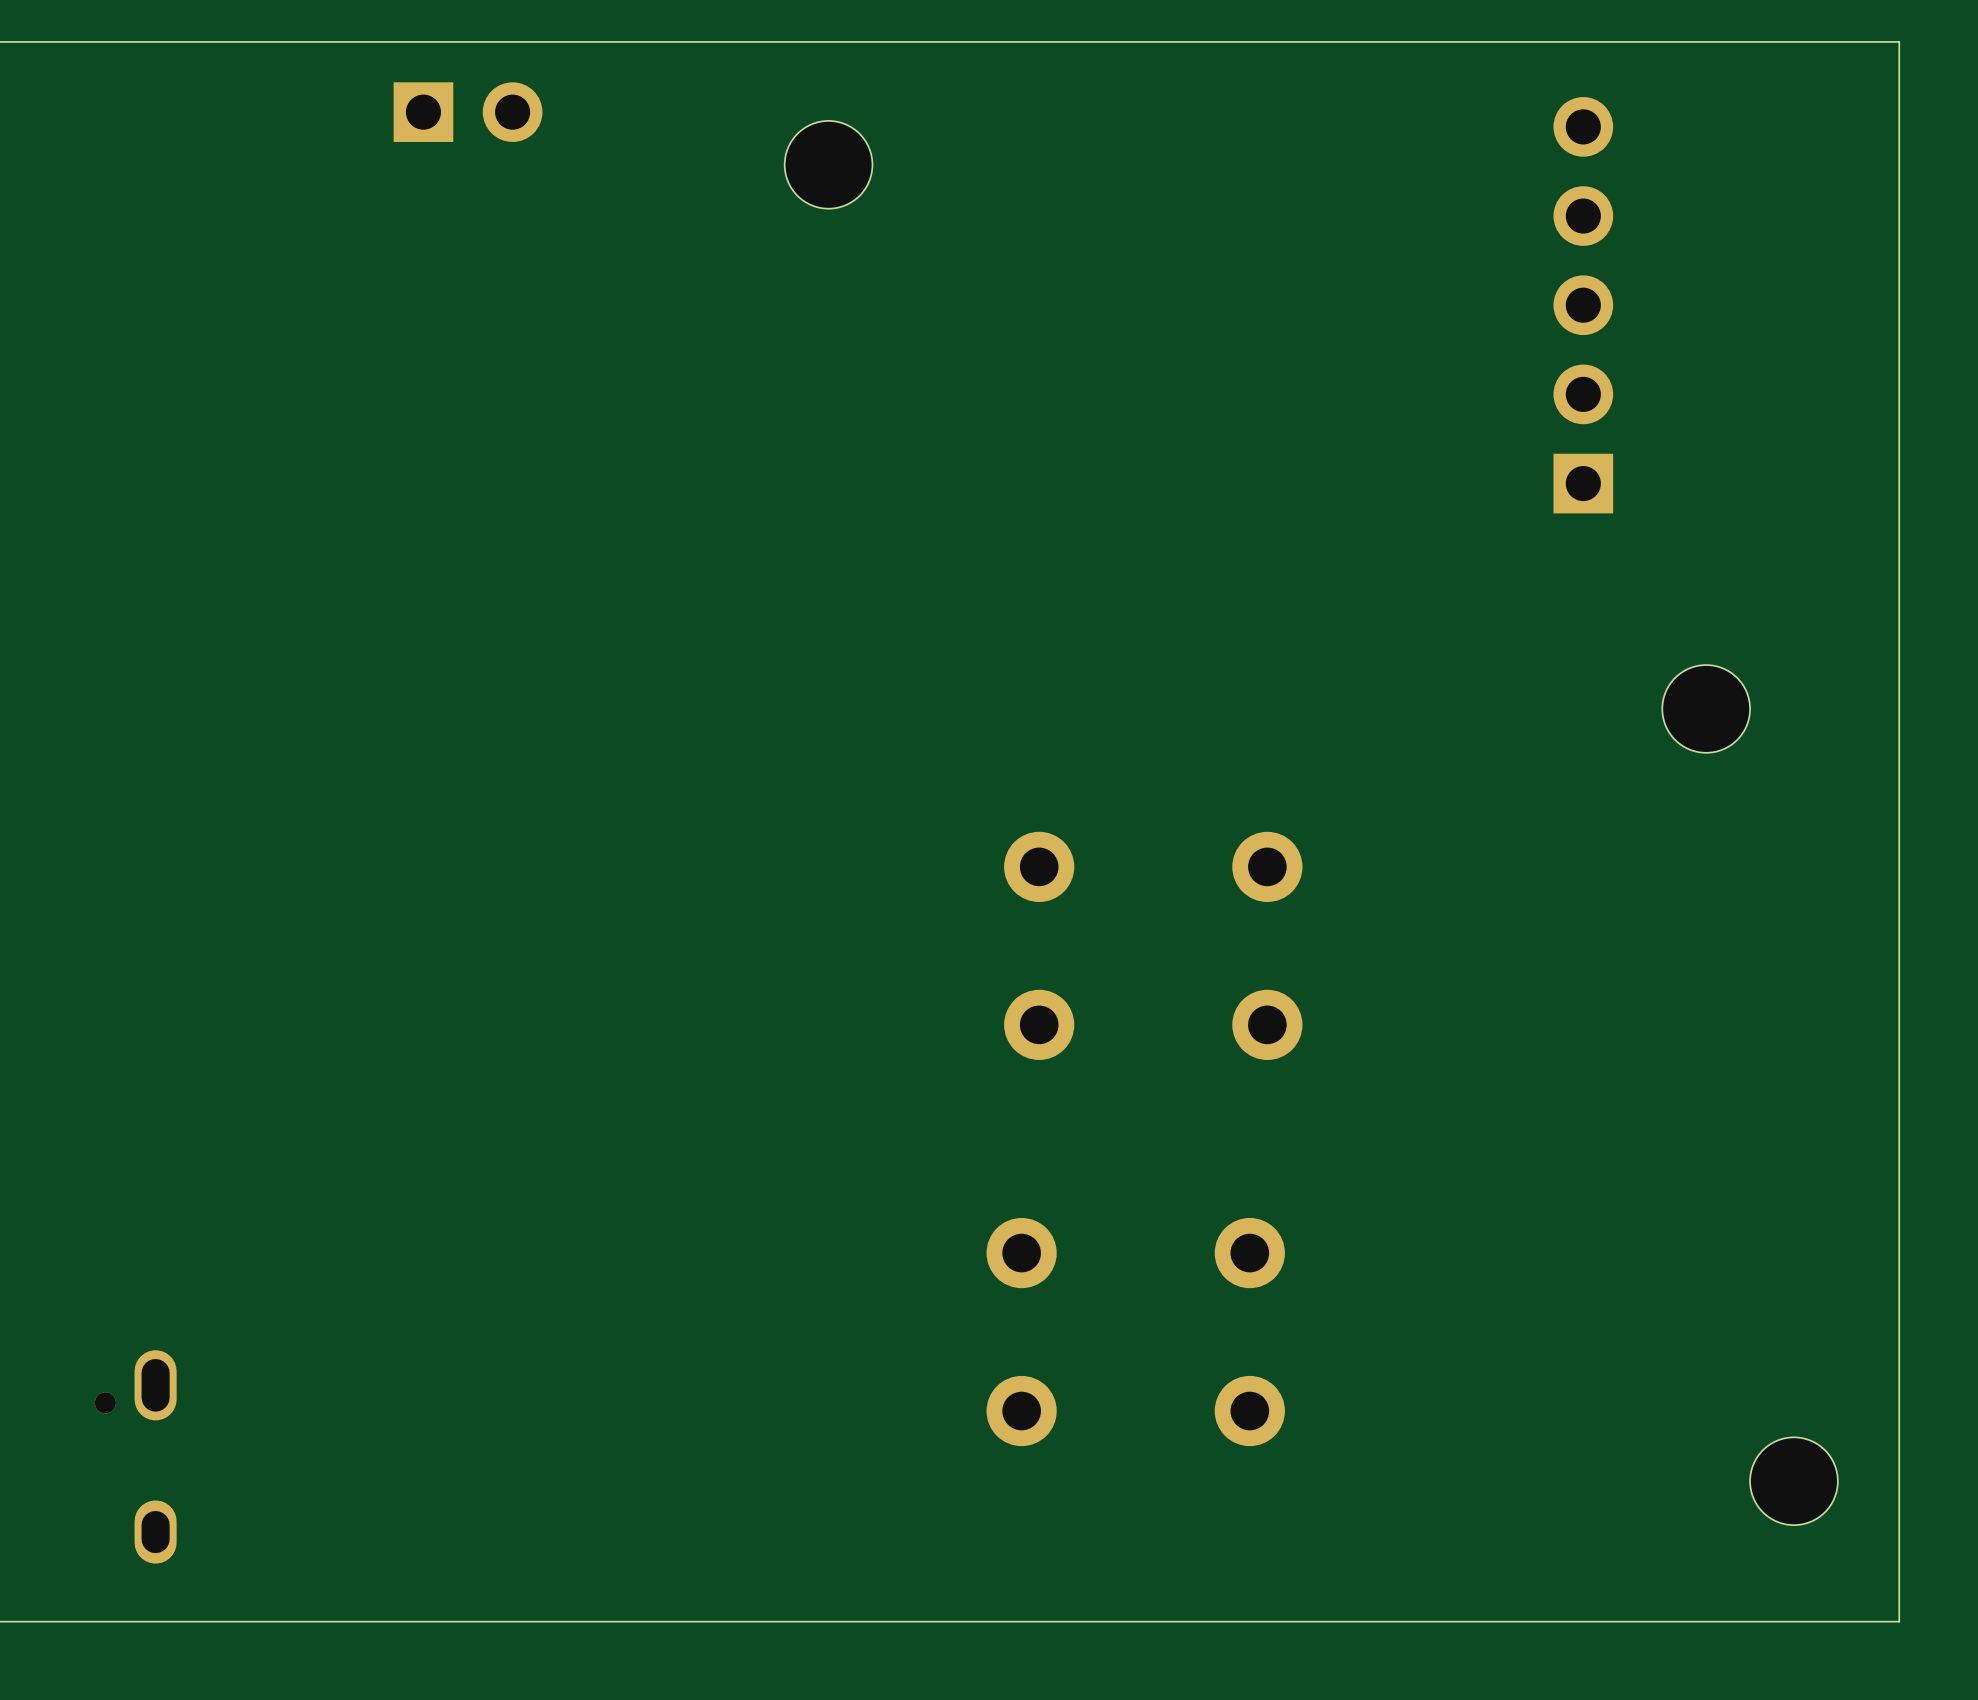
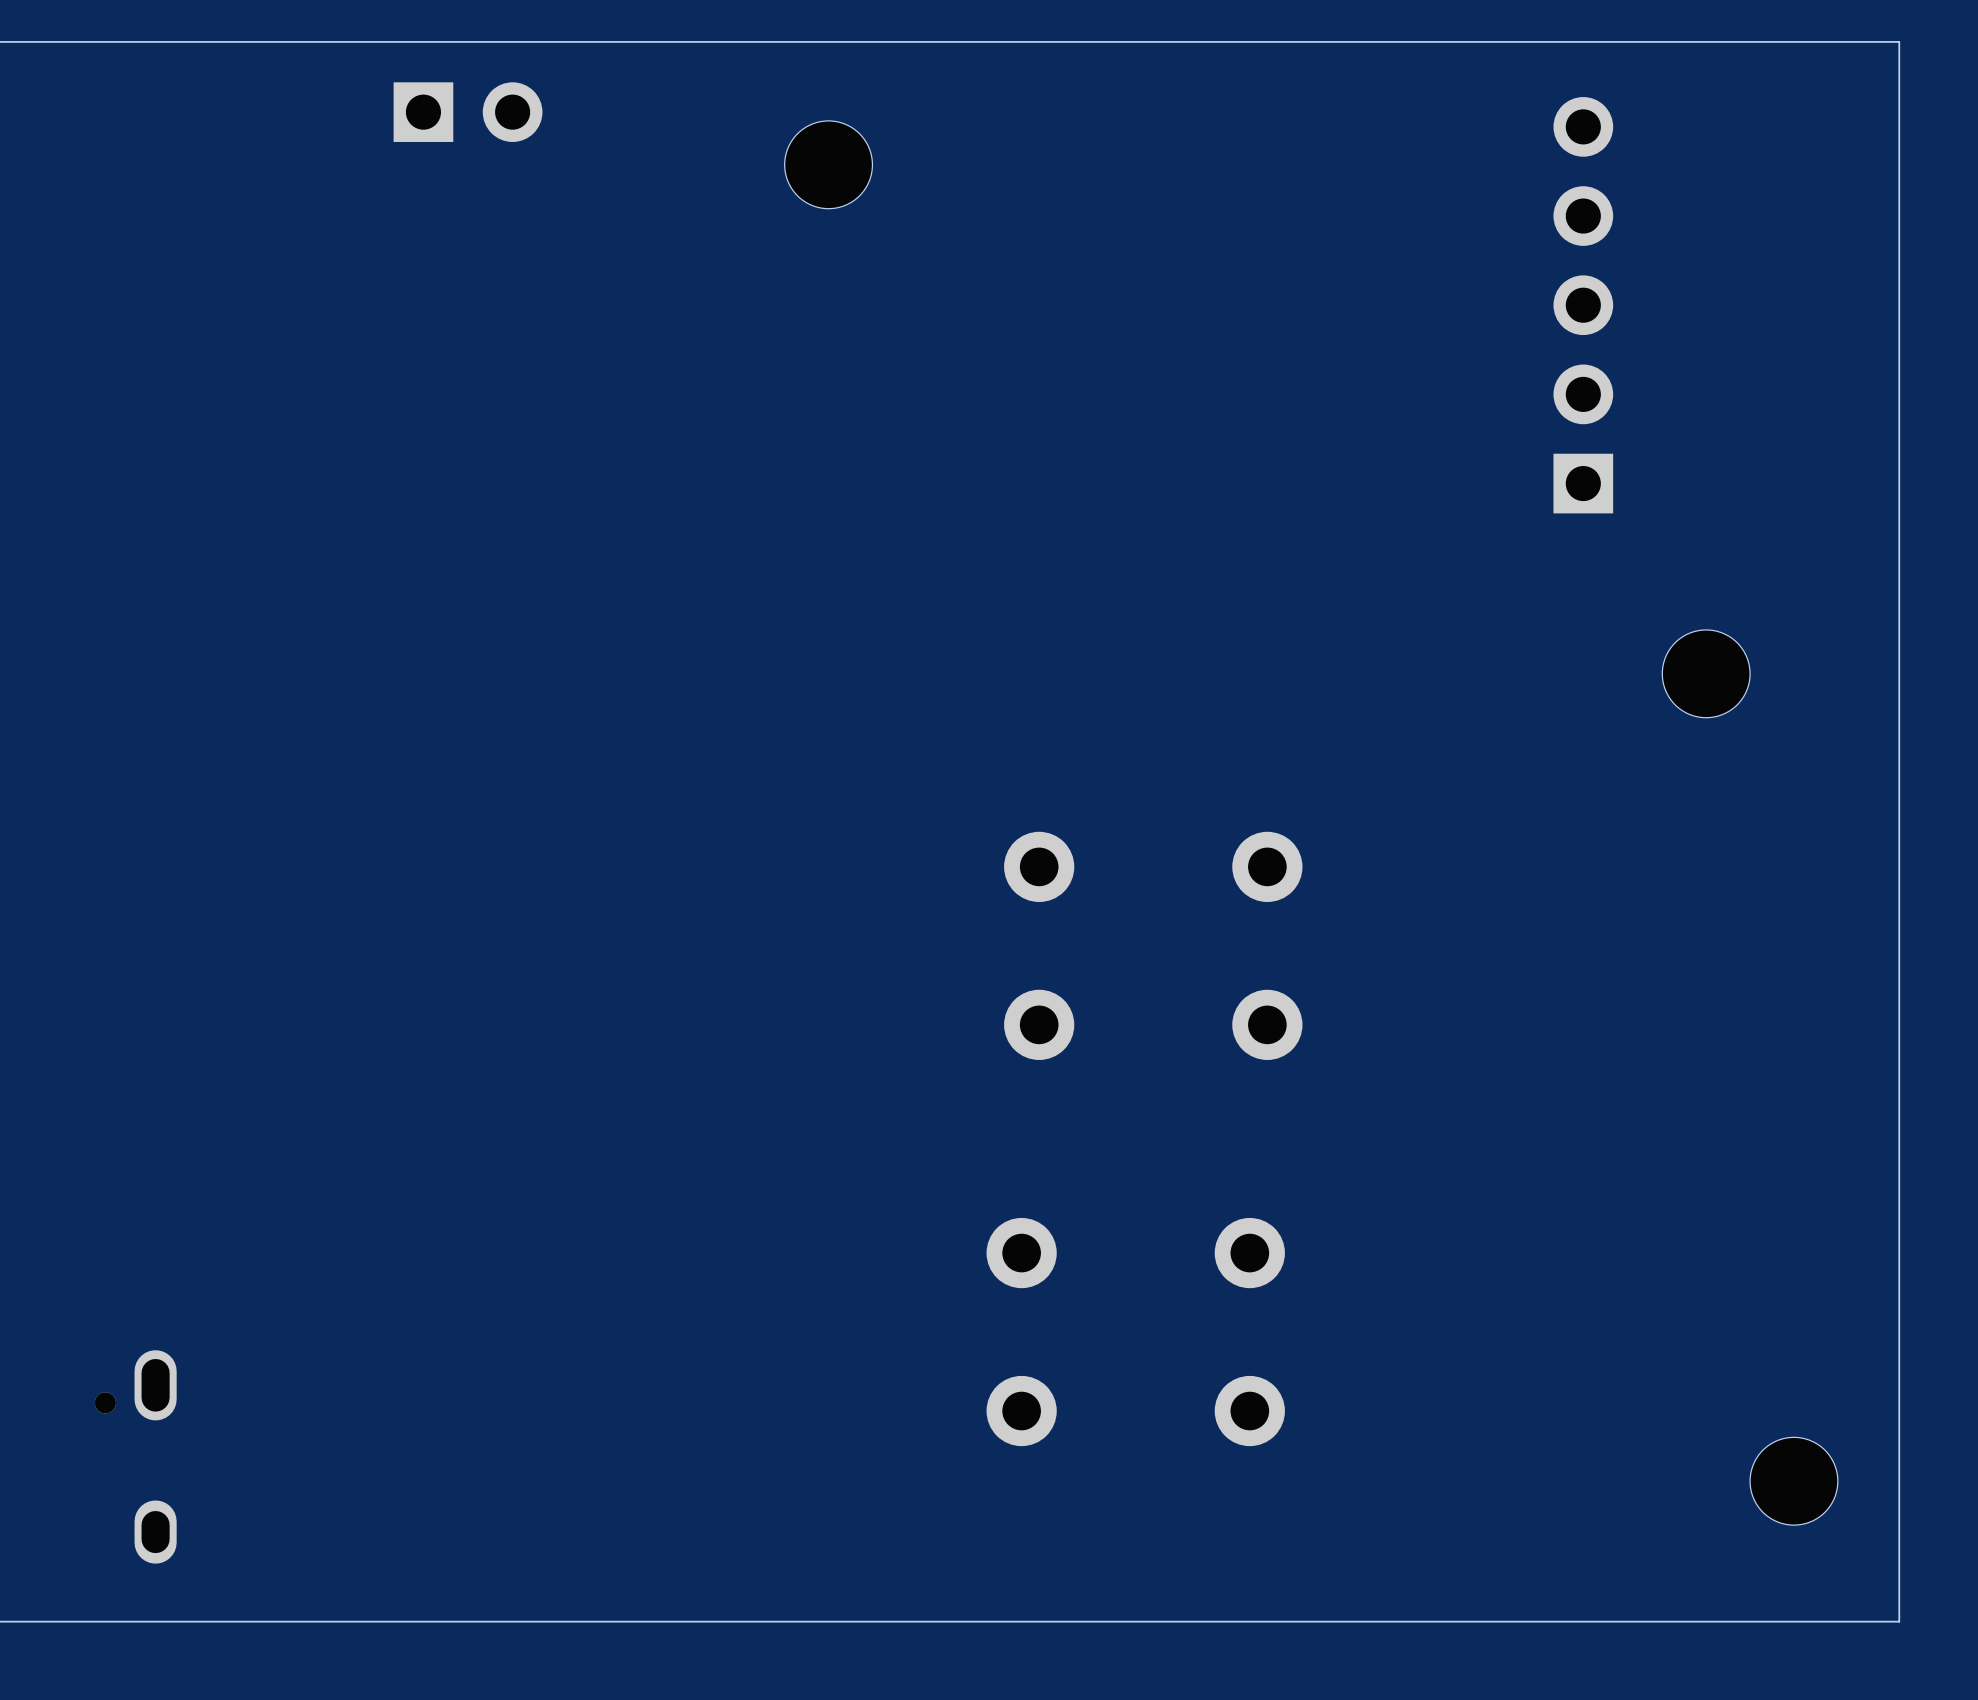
part position: (1706, 708) -> (1706, 673)

